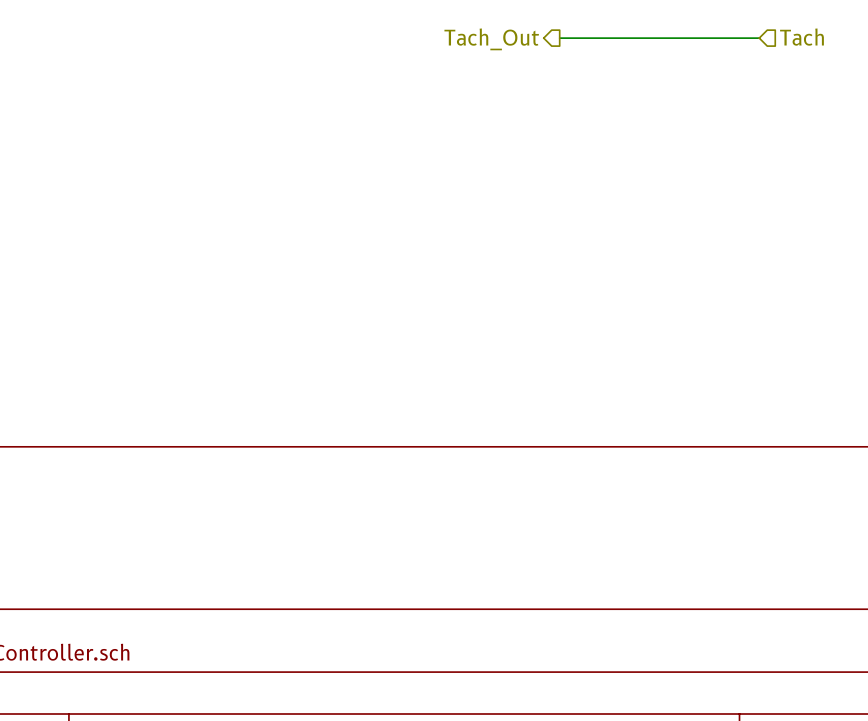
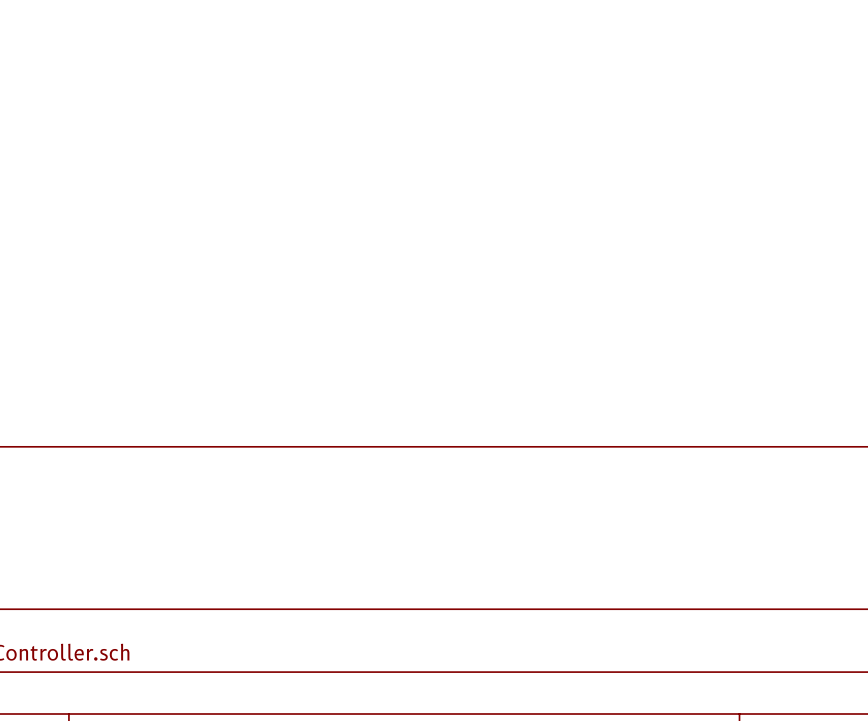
hierarchical label: Tach (801, 37) -> none
wire: (559, 38) (759, 38) -> none
hierarchical label: Tach_Out (491, 39) -> none

